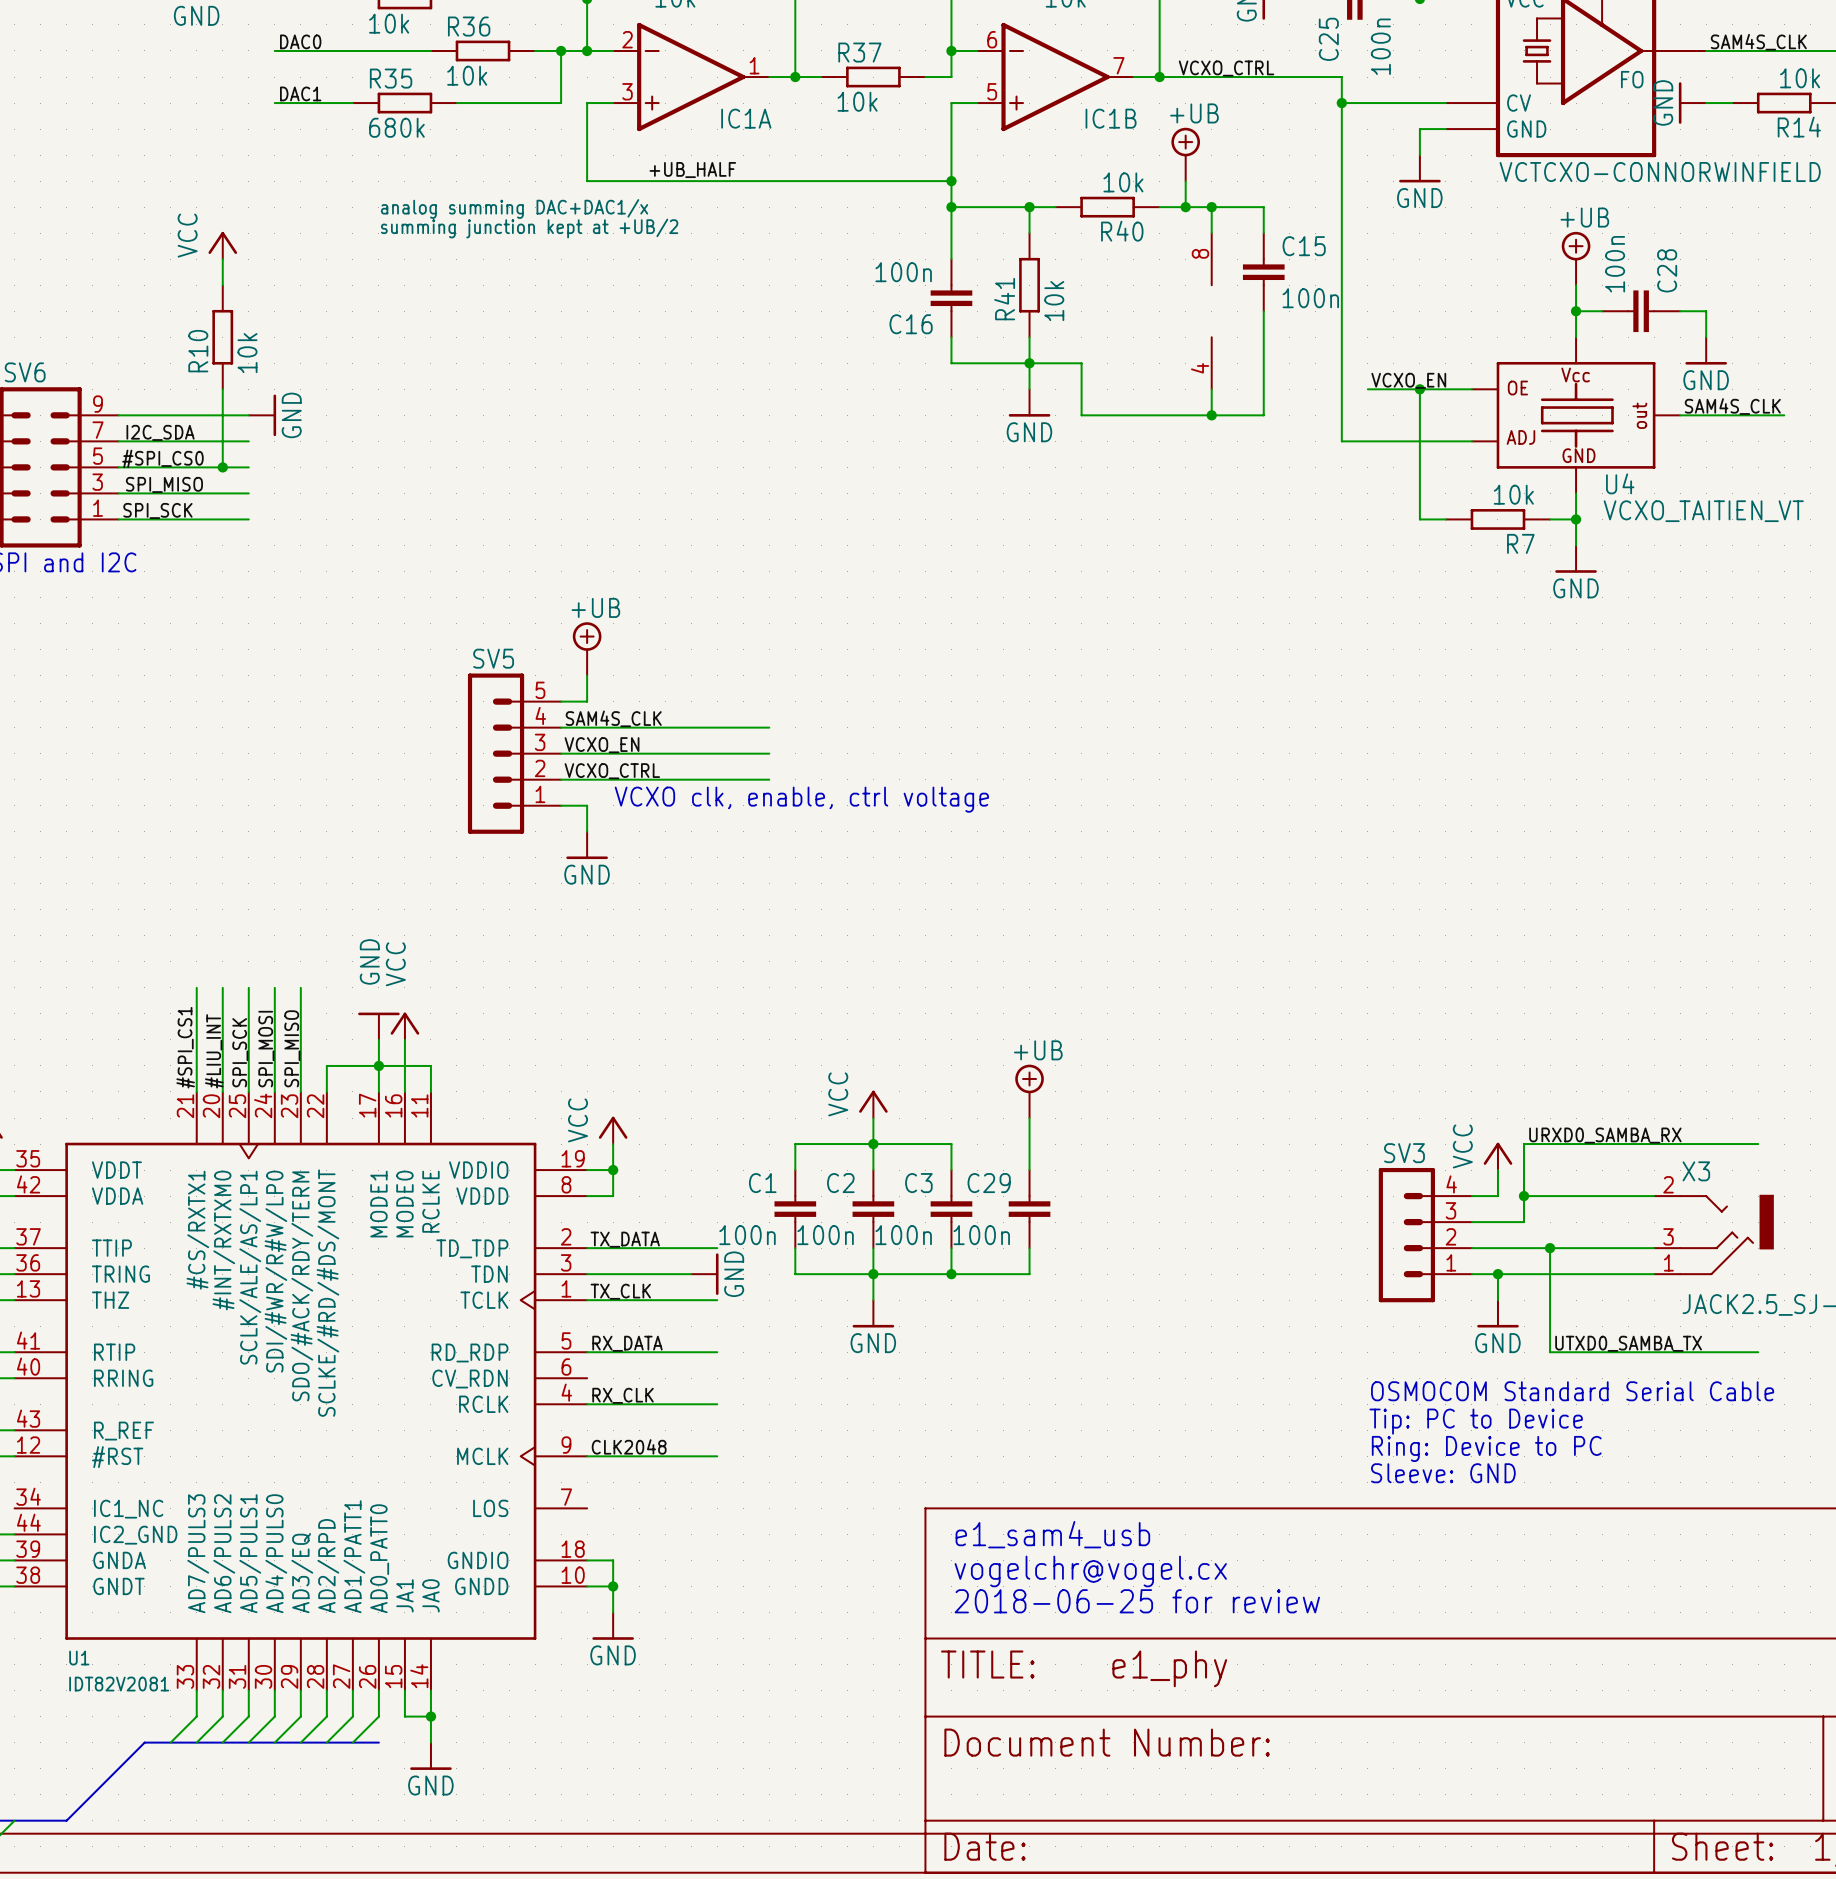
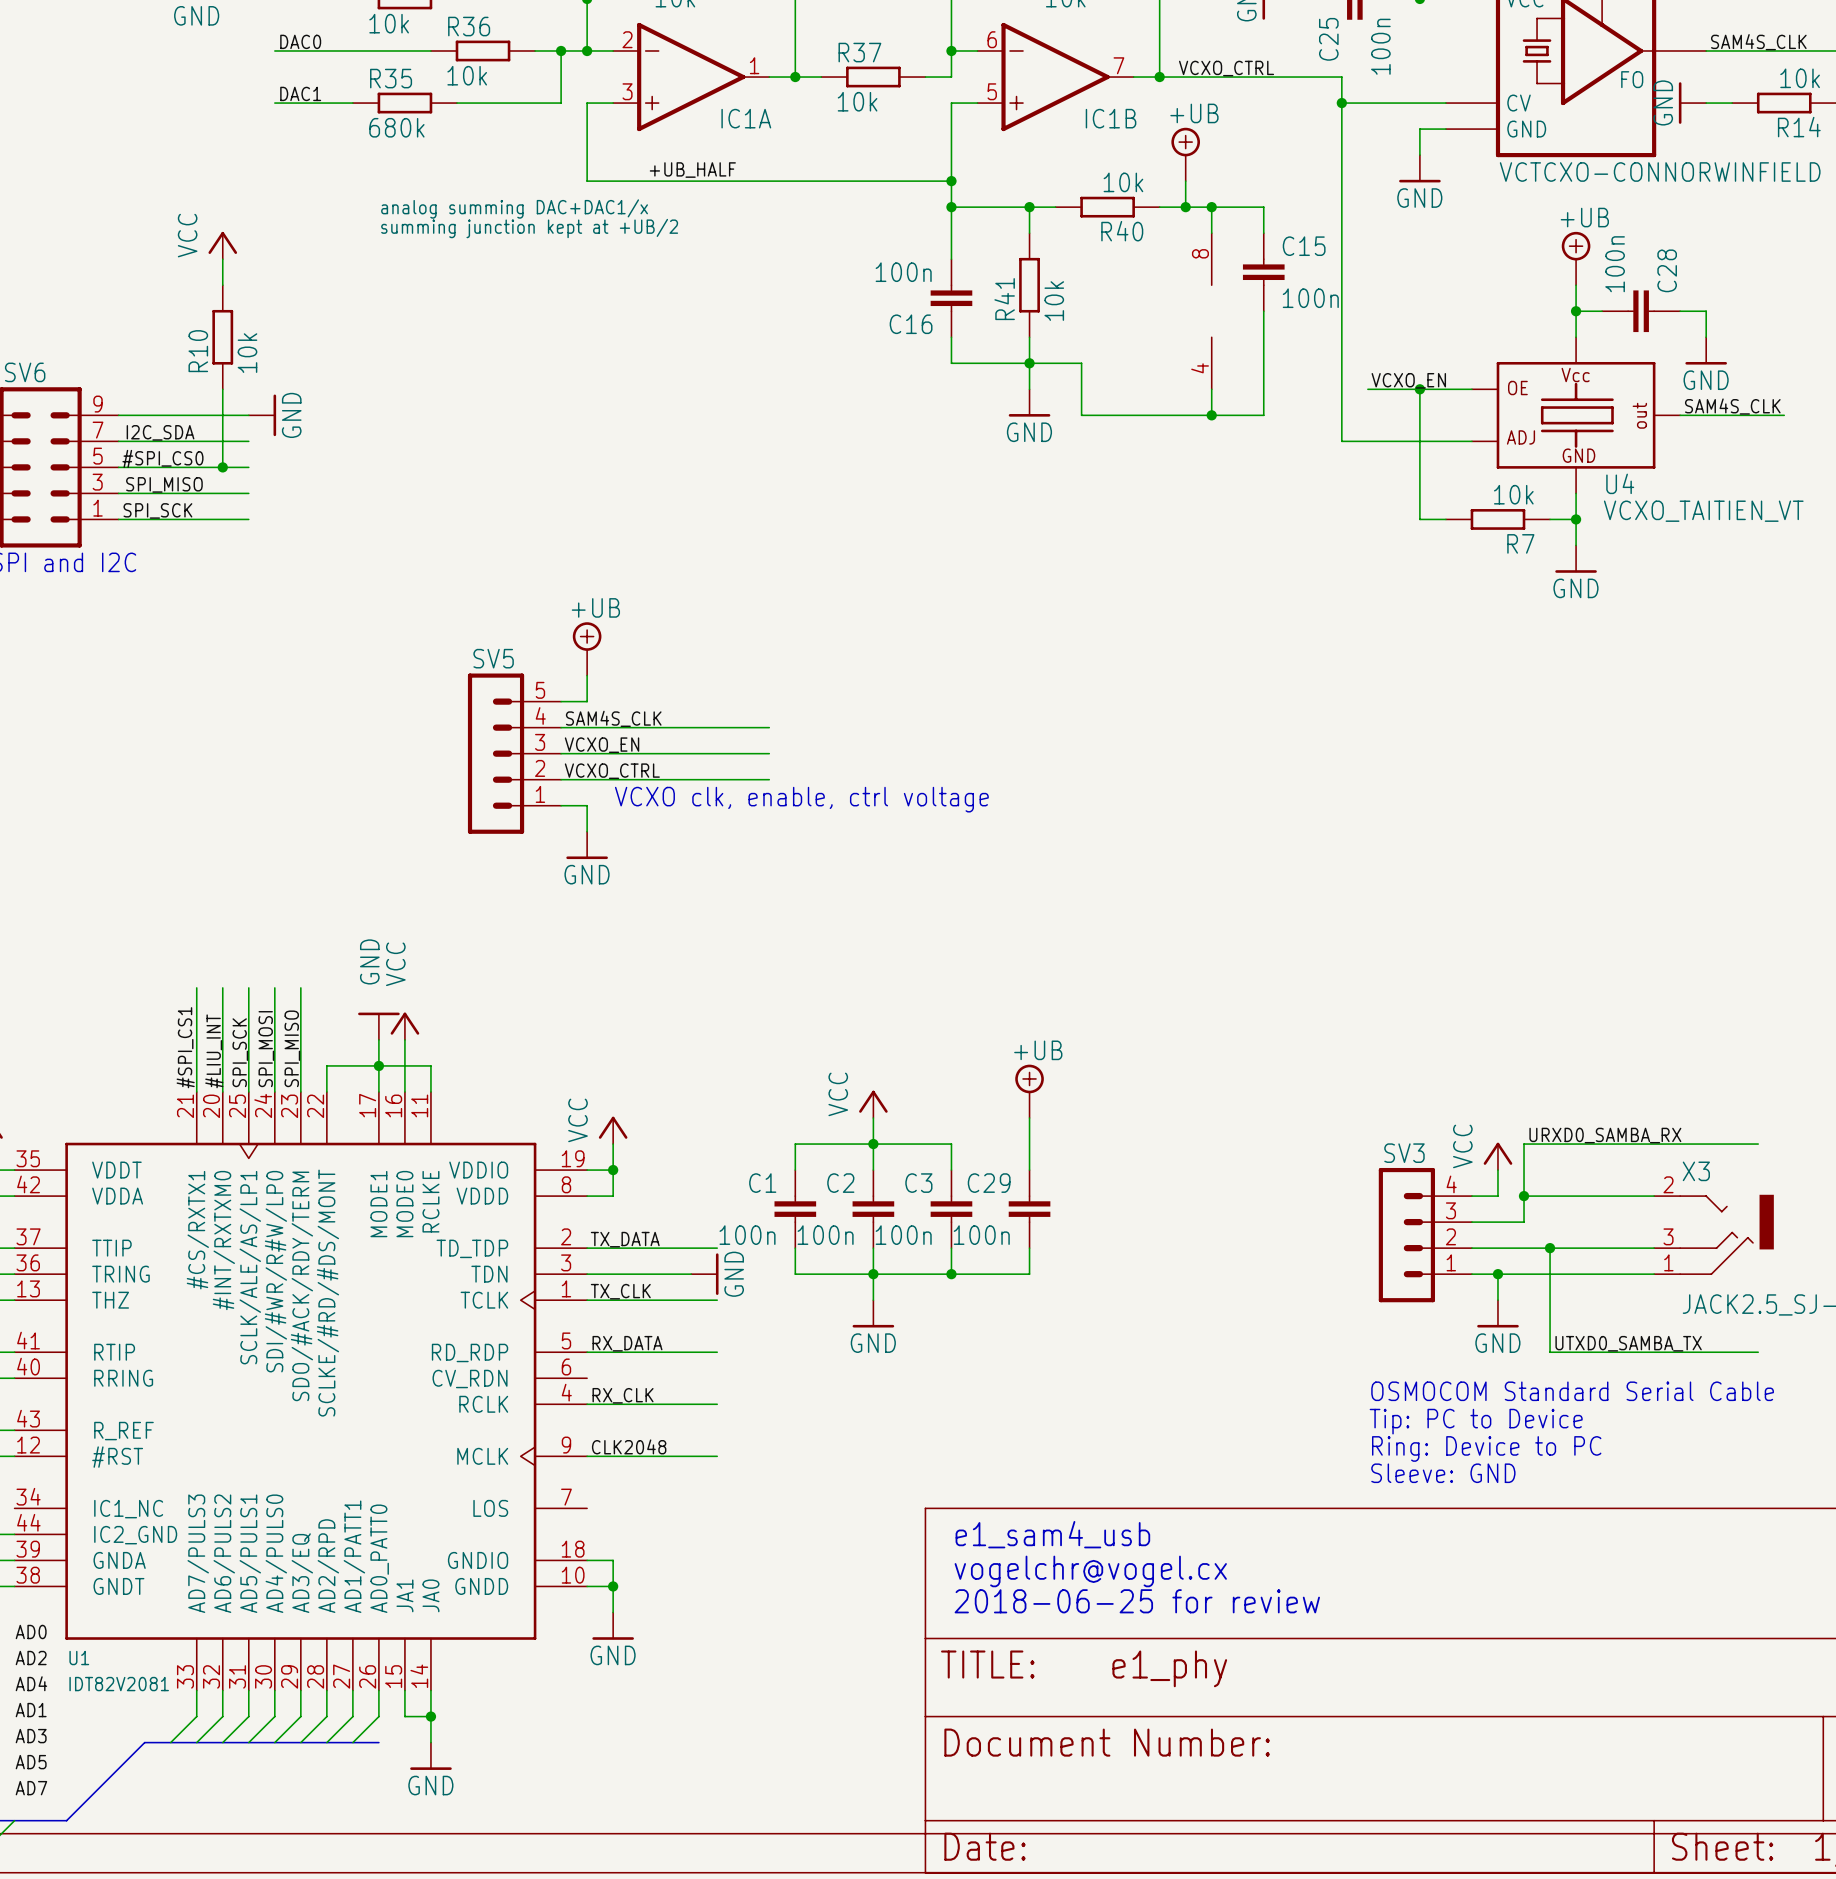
label: none -> AD0 (31, 1632)
label: none -> AD2 (31, 1658)
label: none -> AD4 (31, 1683)
label: none -> AD1 (31, 1710)
label: none -> AD3 (31, 1736)
label: none -> AD5 (31, 1762)
label: none -> AD7 (31, 1788)

